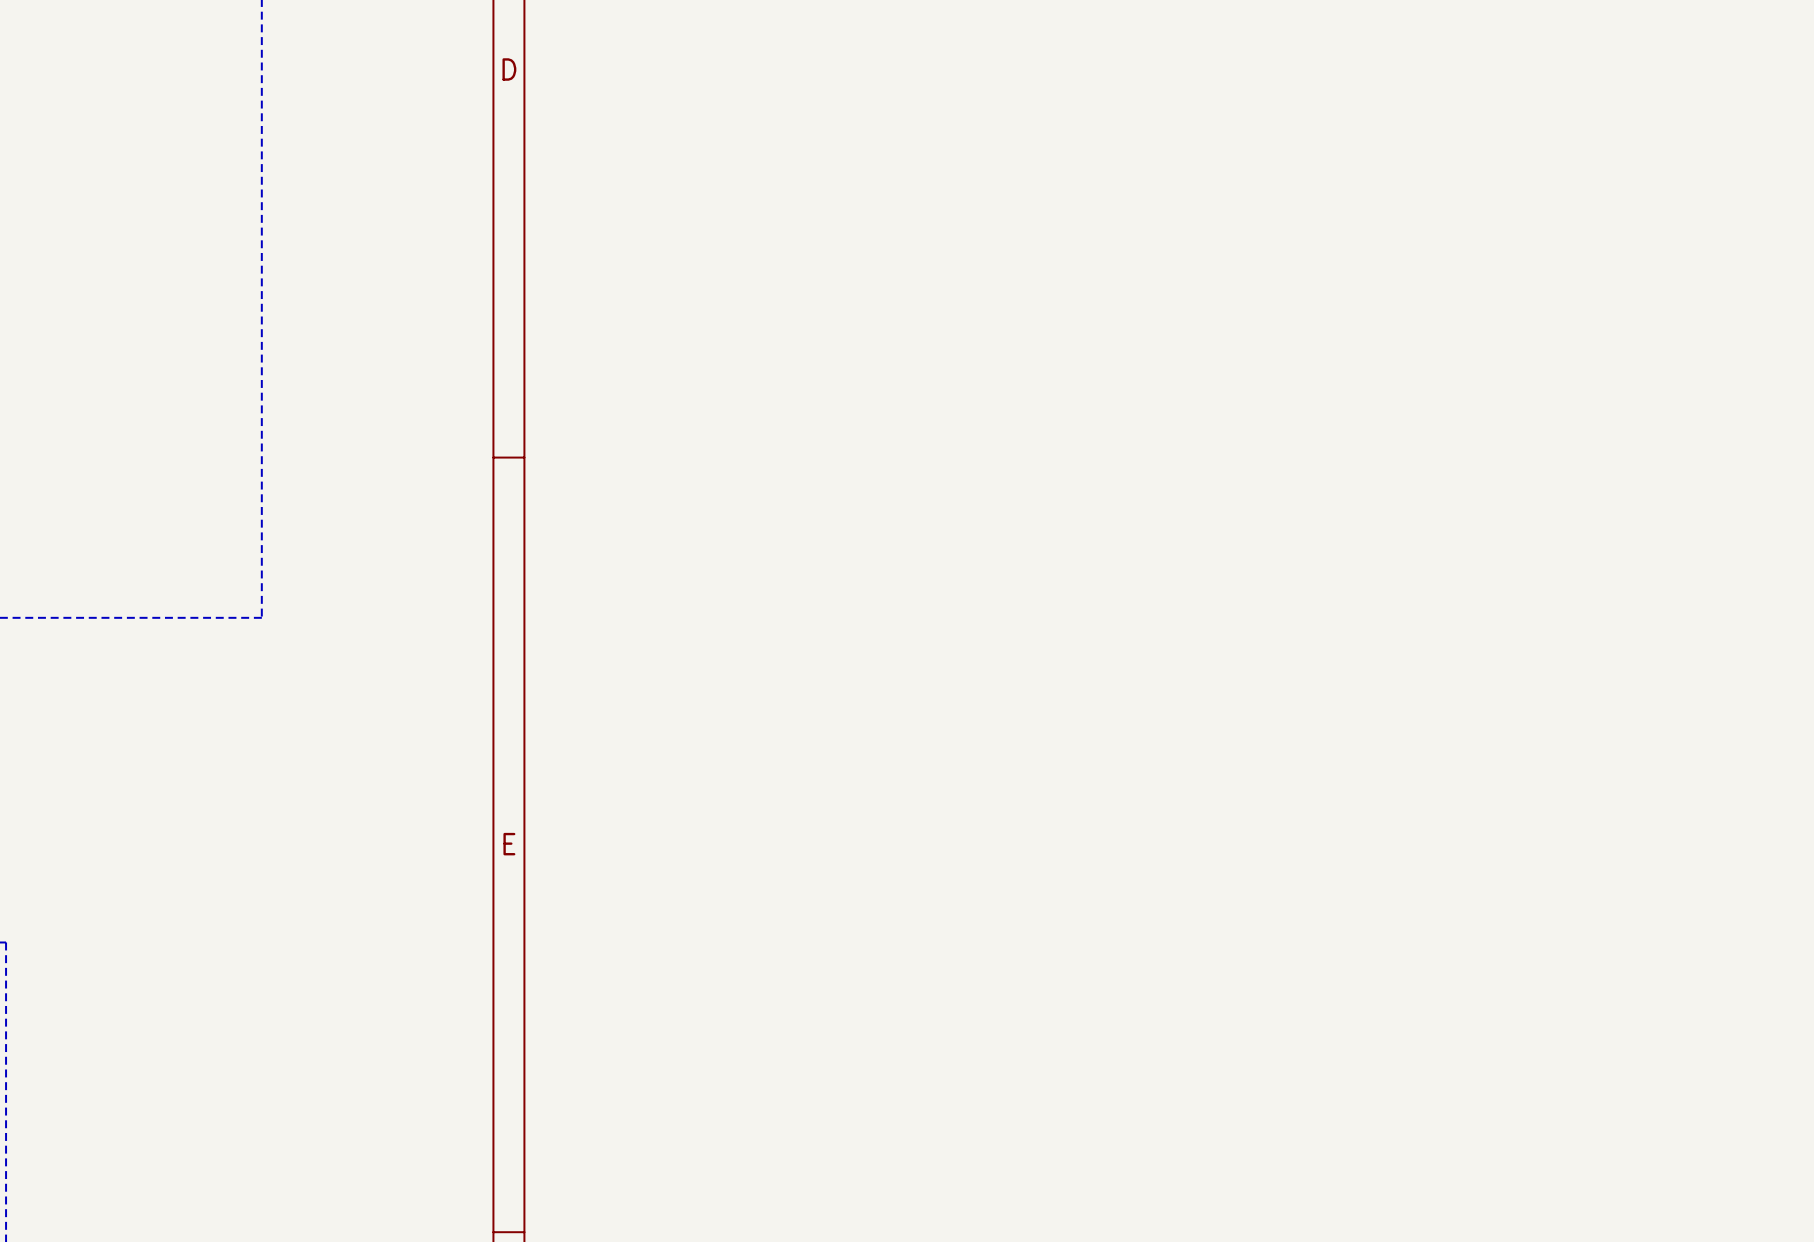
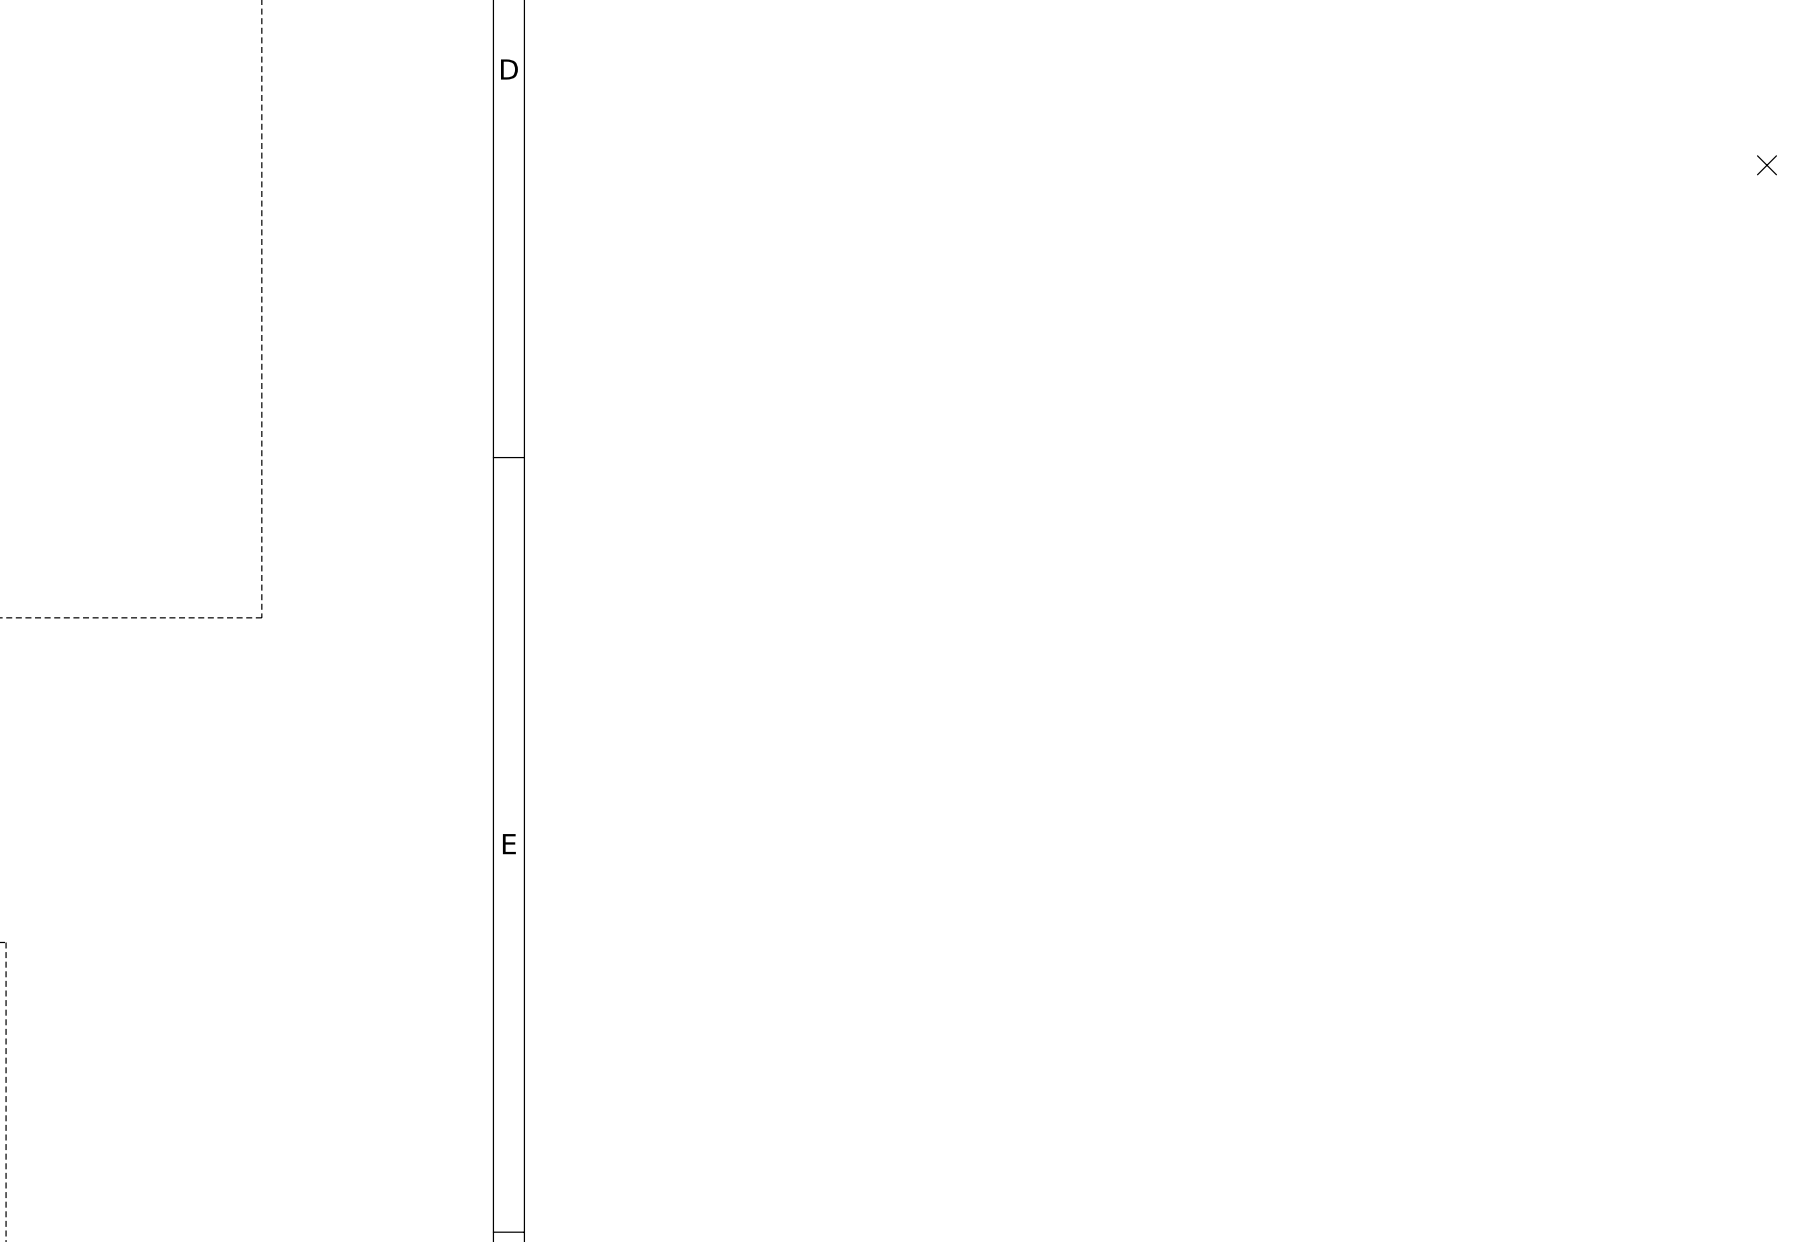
no-connect mark: none -> (1766, 165)

